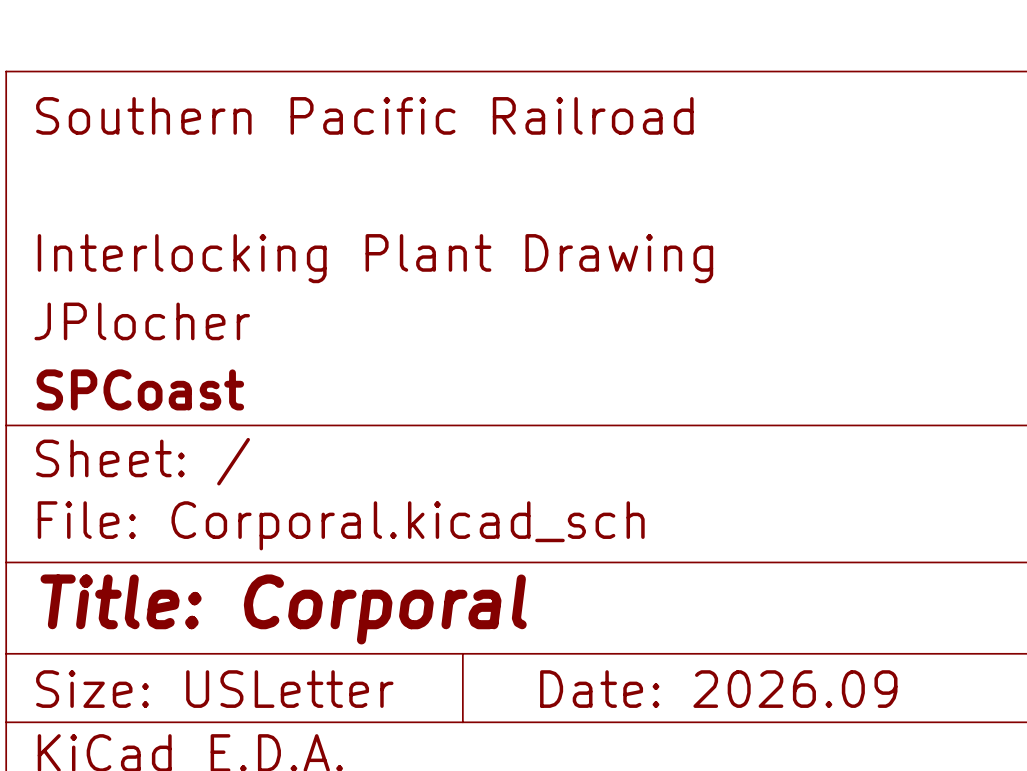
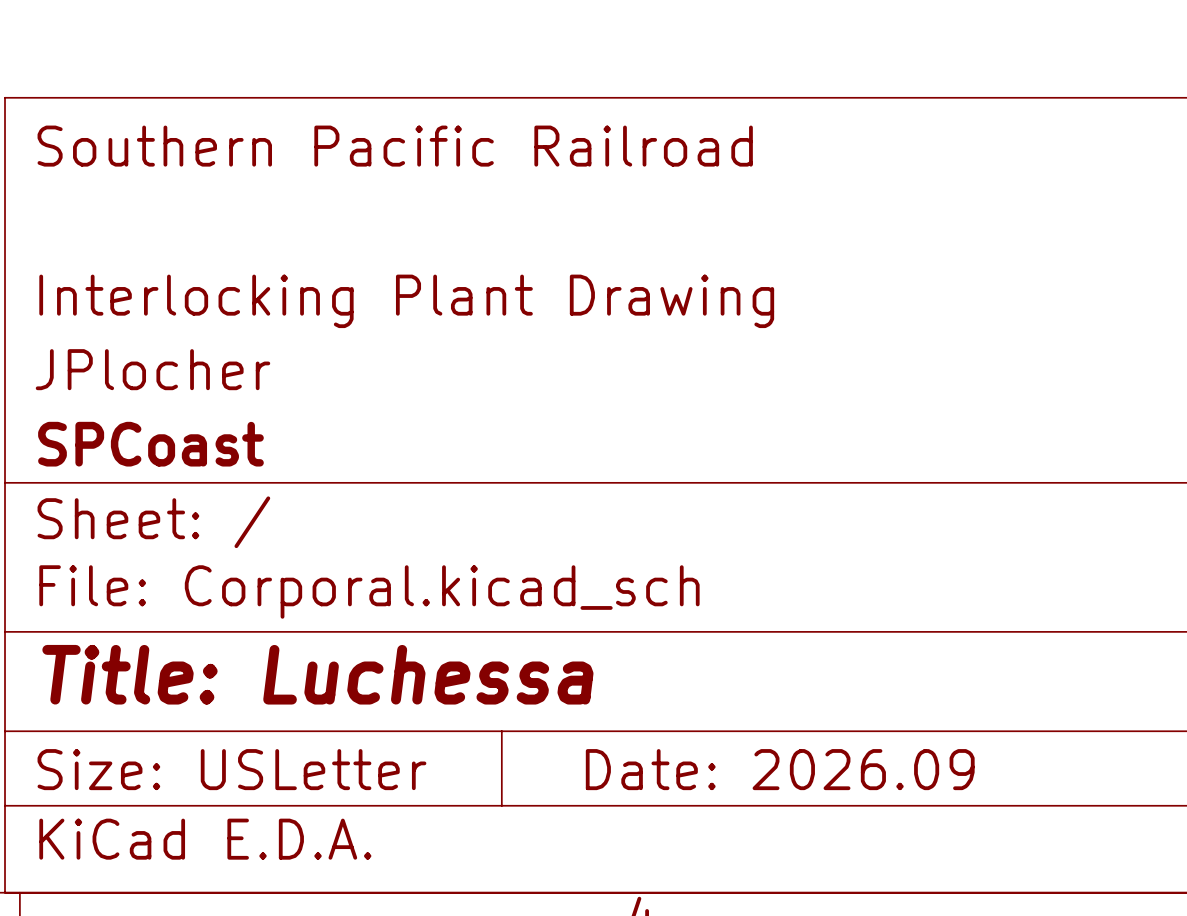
title block: Title: Corporal (283, 609) -> Title: Luchessa (317, 674)

